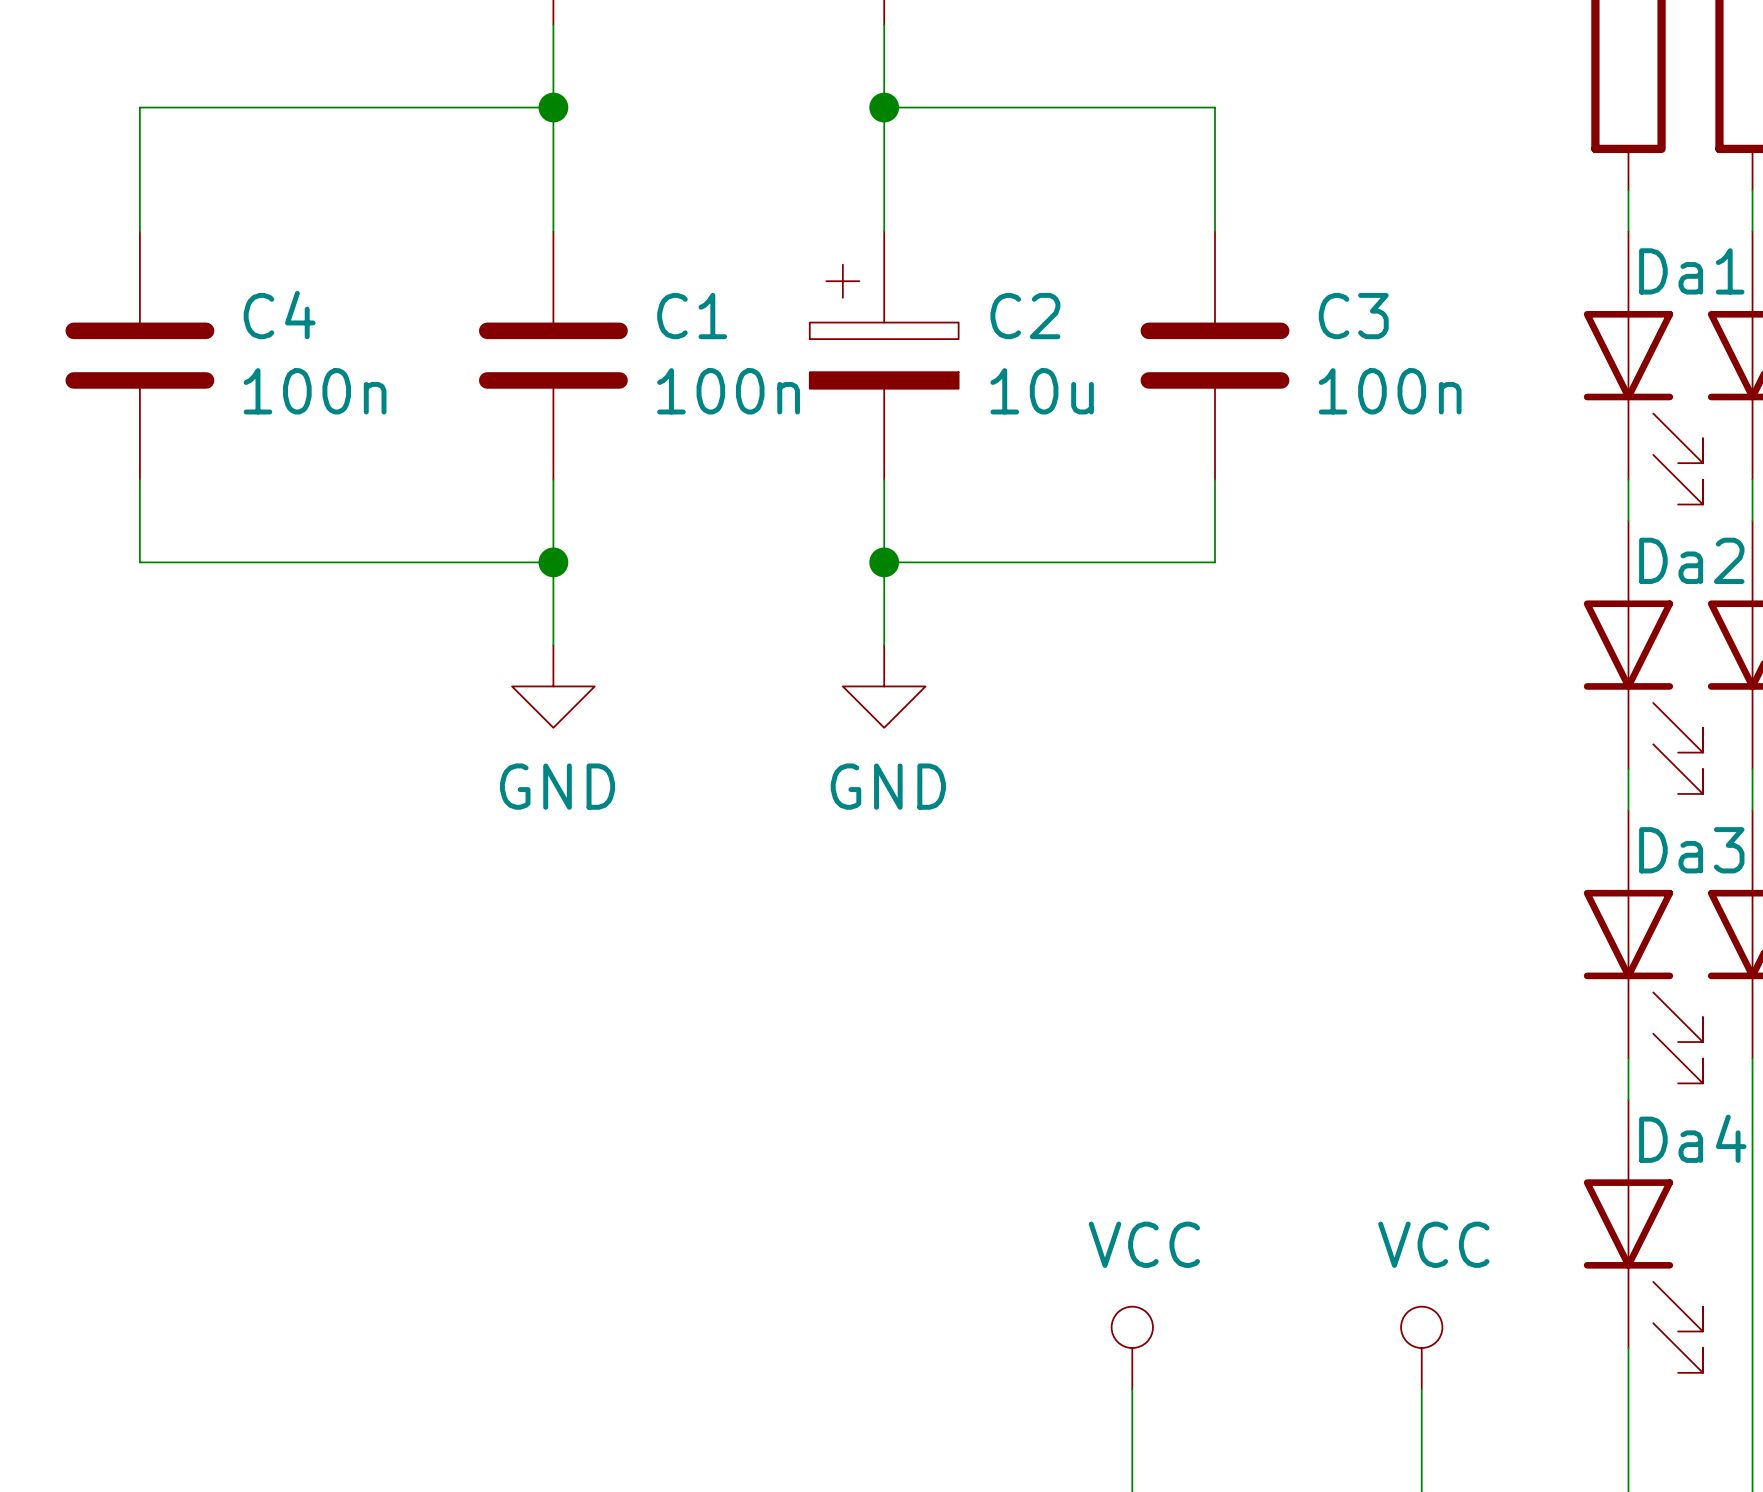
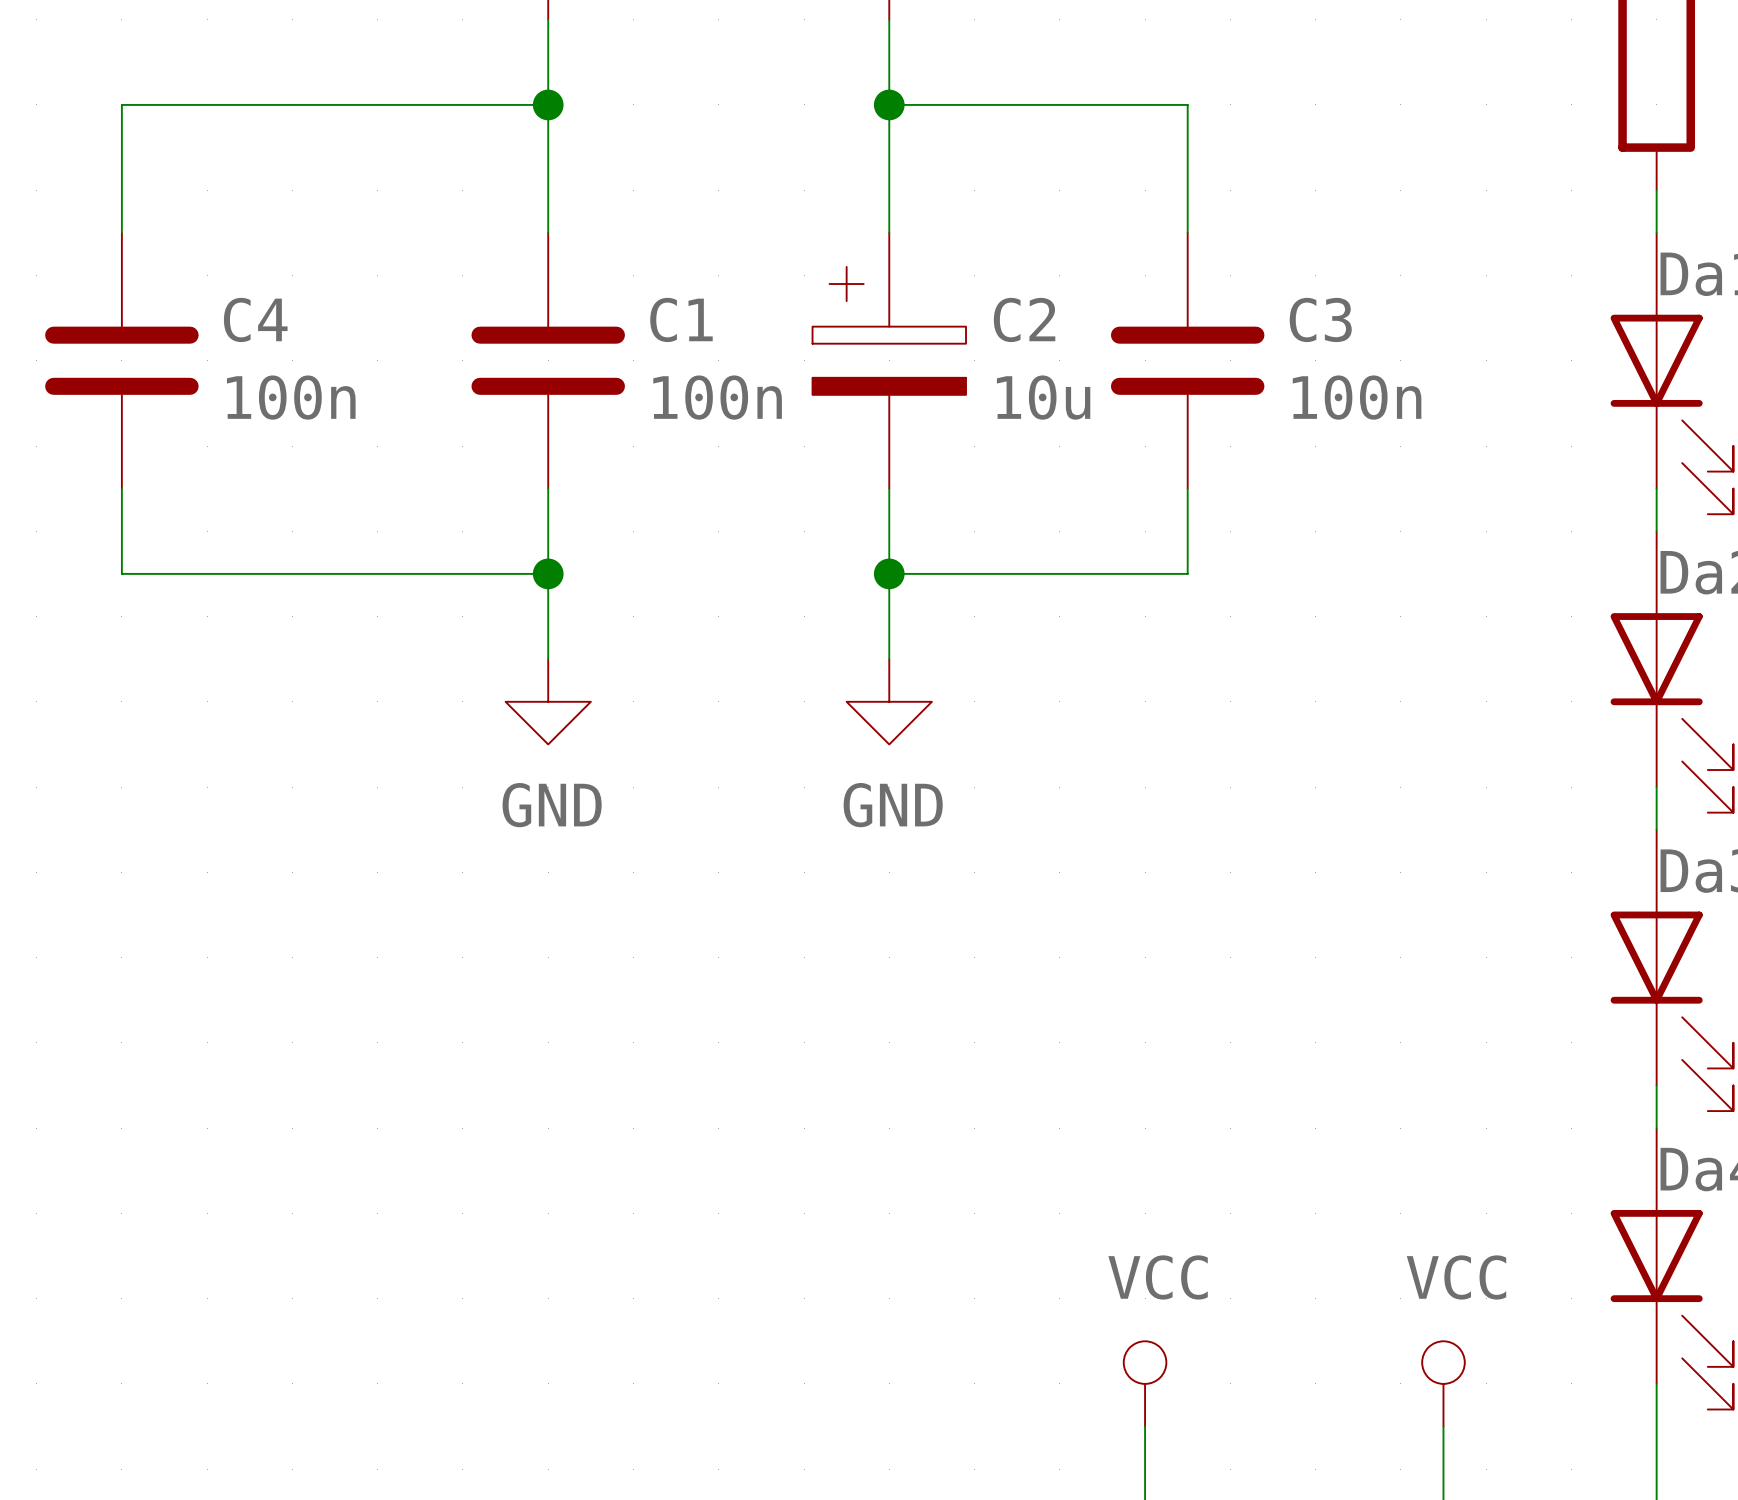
wire: (1173, 107) (1214, 107) (1214, 231) -> (1187, 104) (1187, 232)
C3 position: (1214, 355) -> (1187, 360)
wire: (1214, 479) (1214, 562) (1173, 562) -> (1187, 488) (1187, 573)

